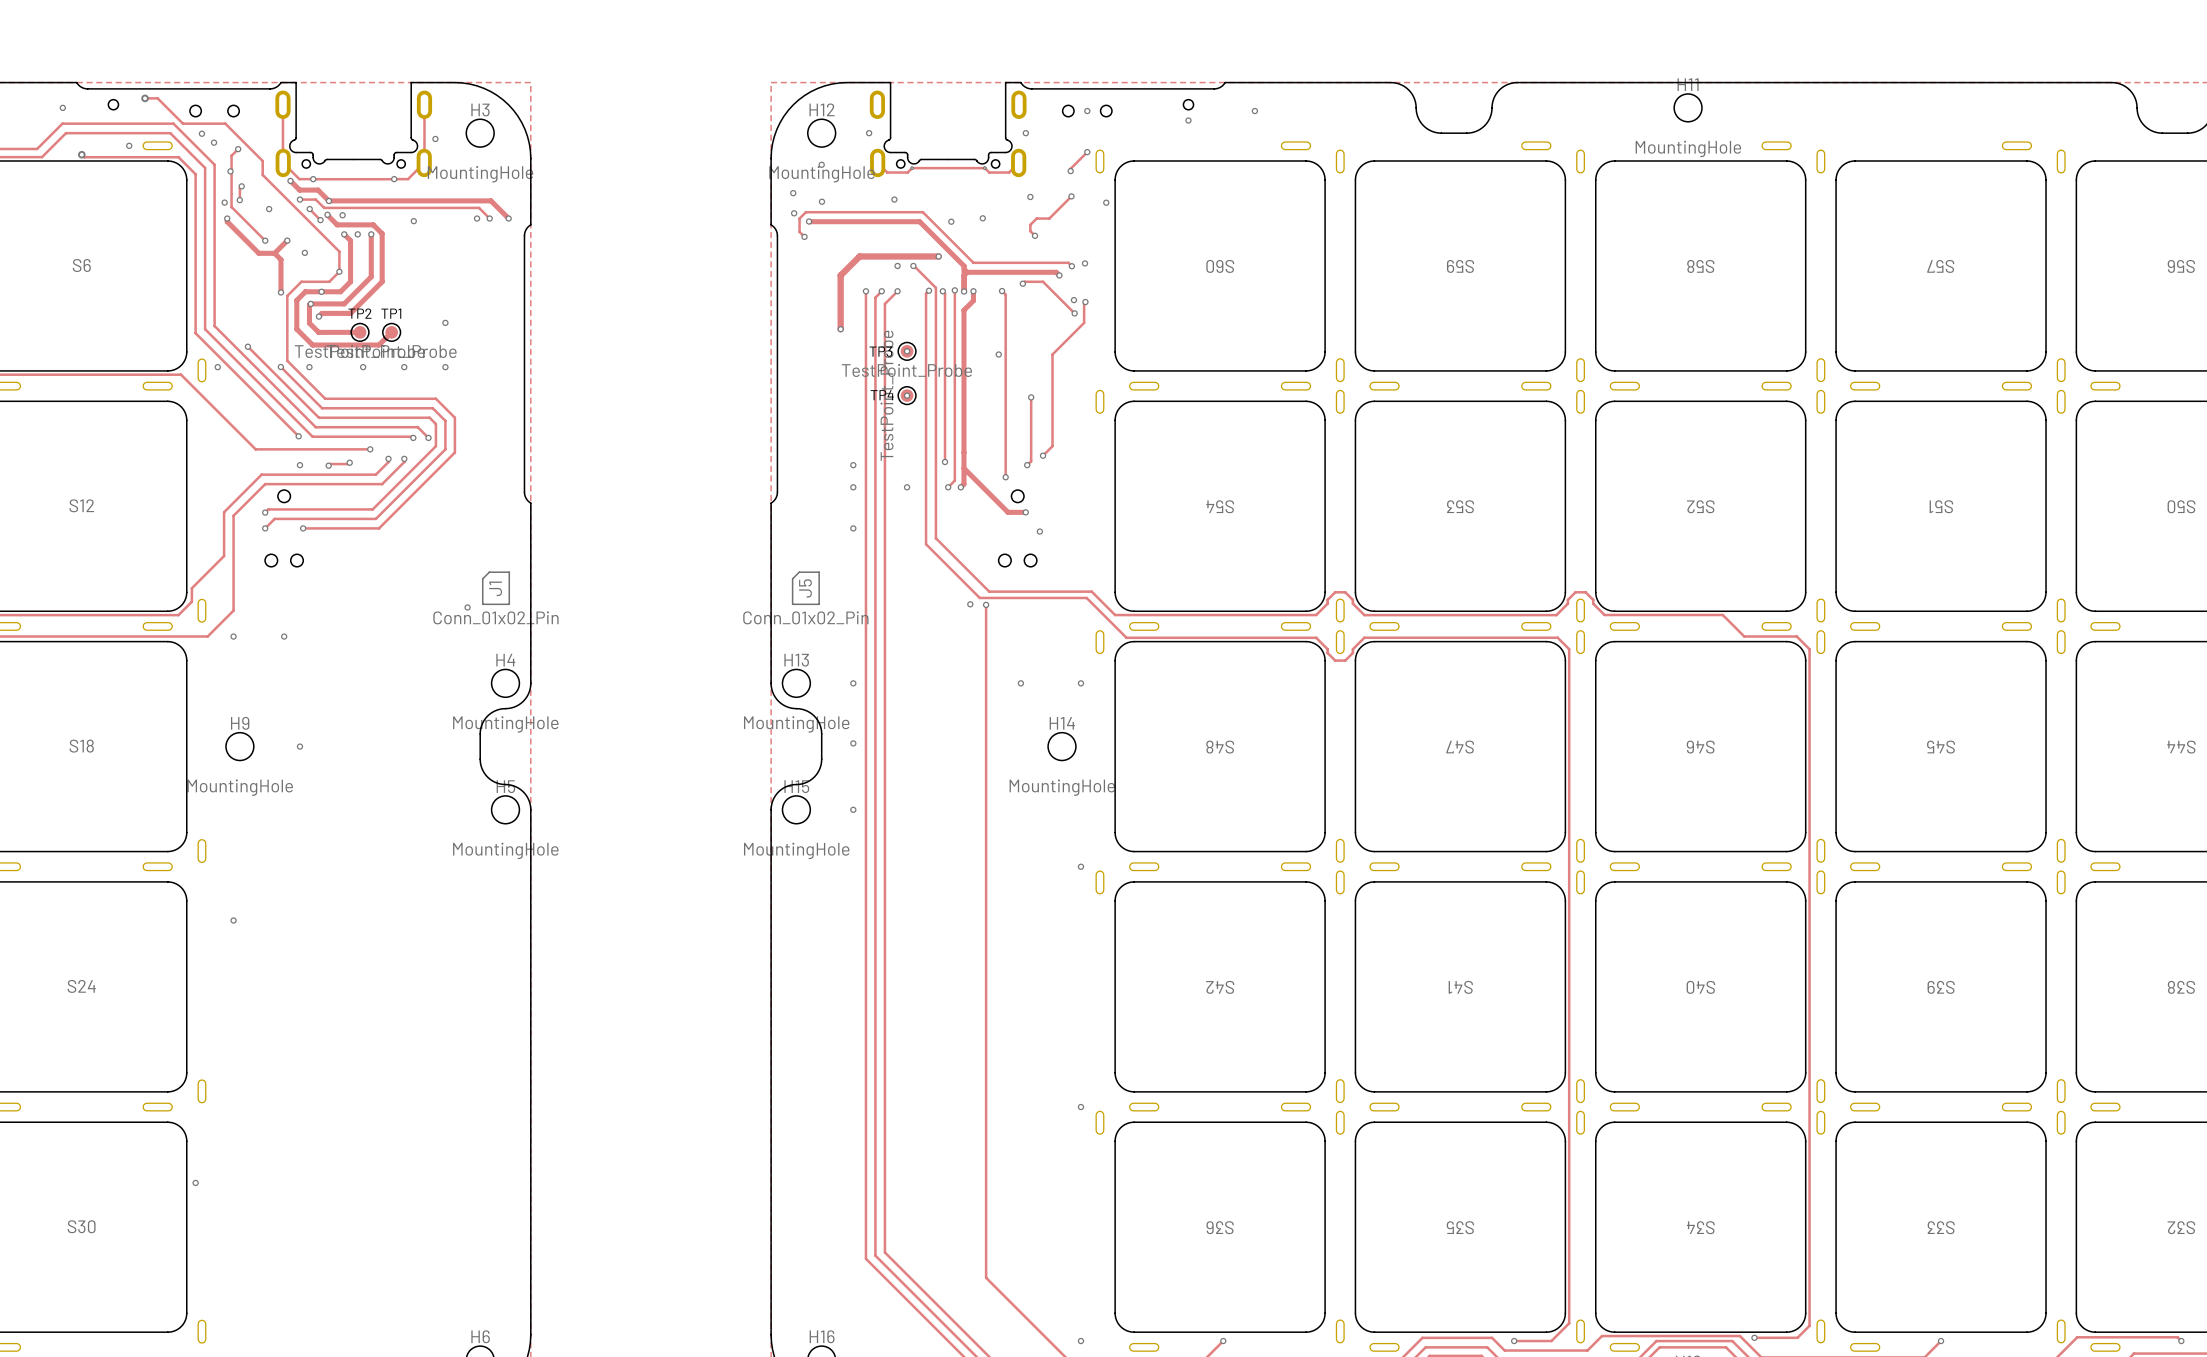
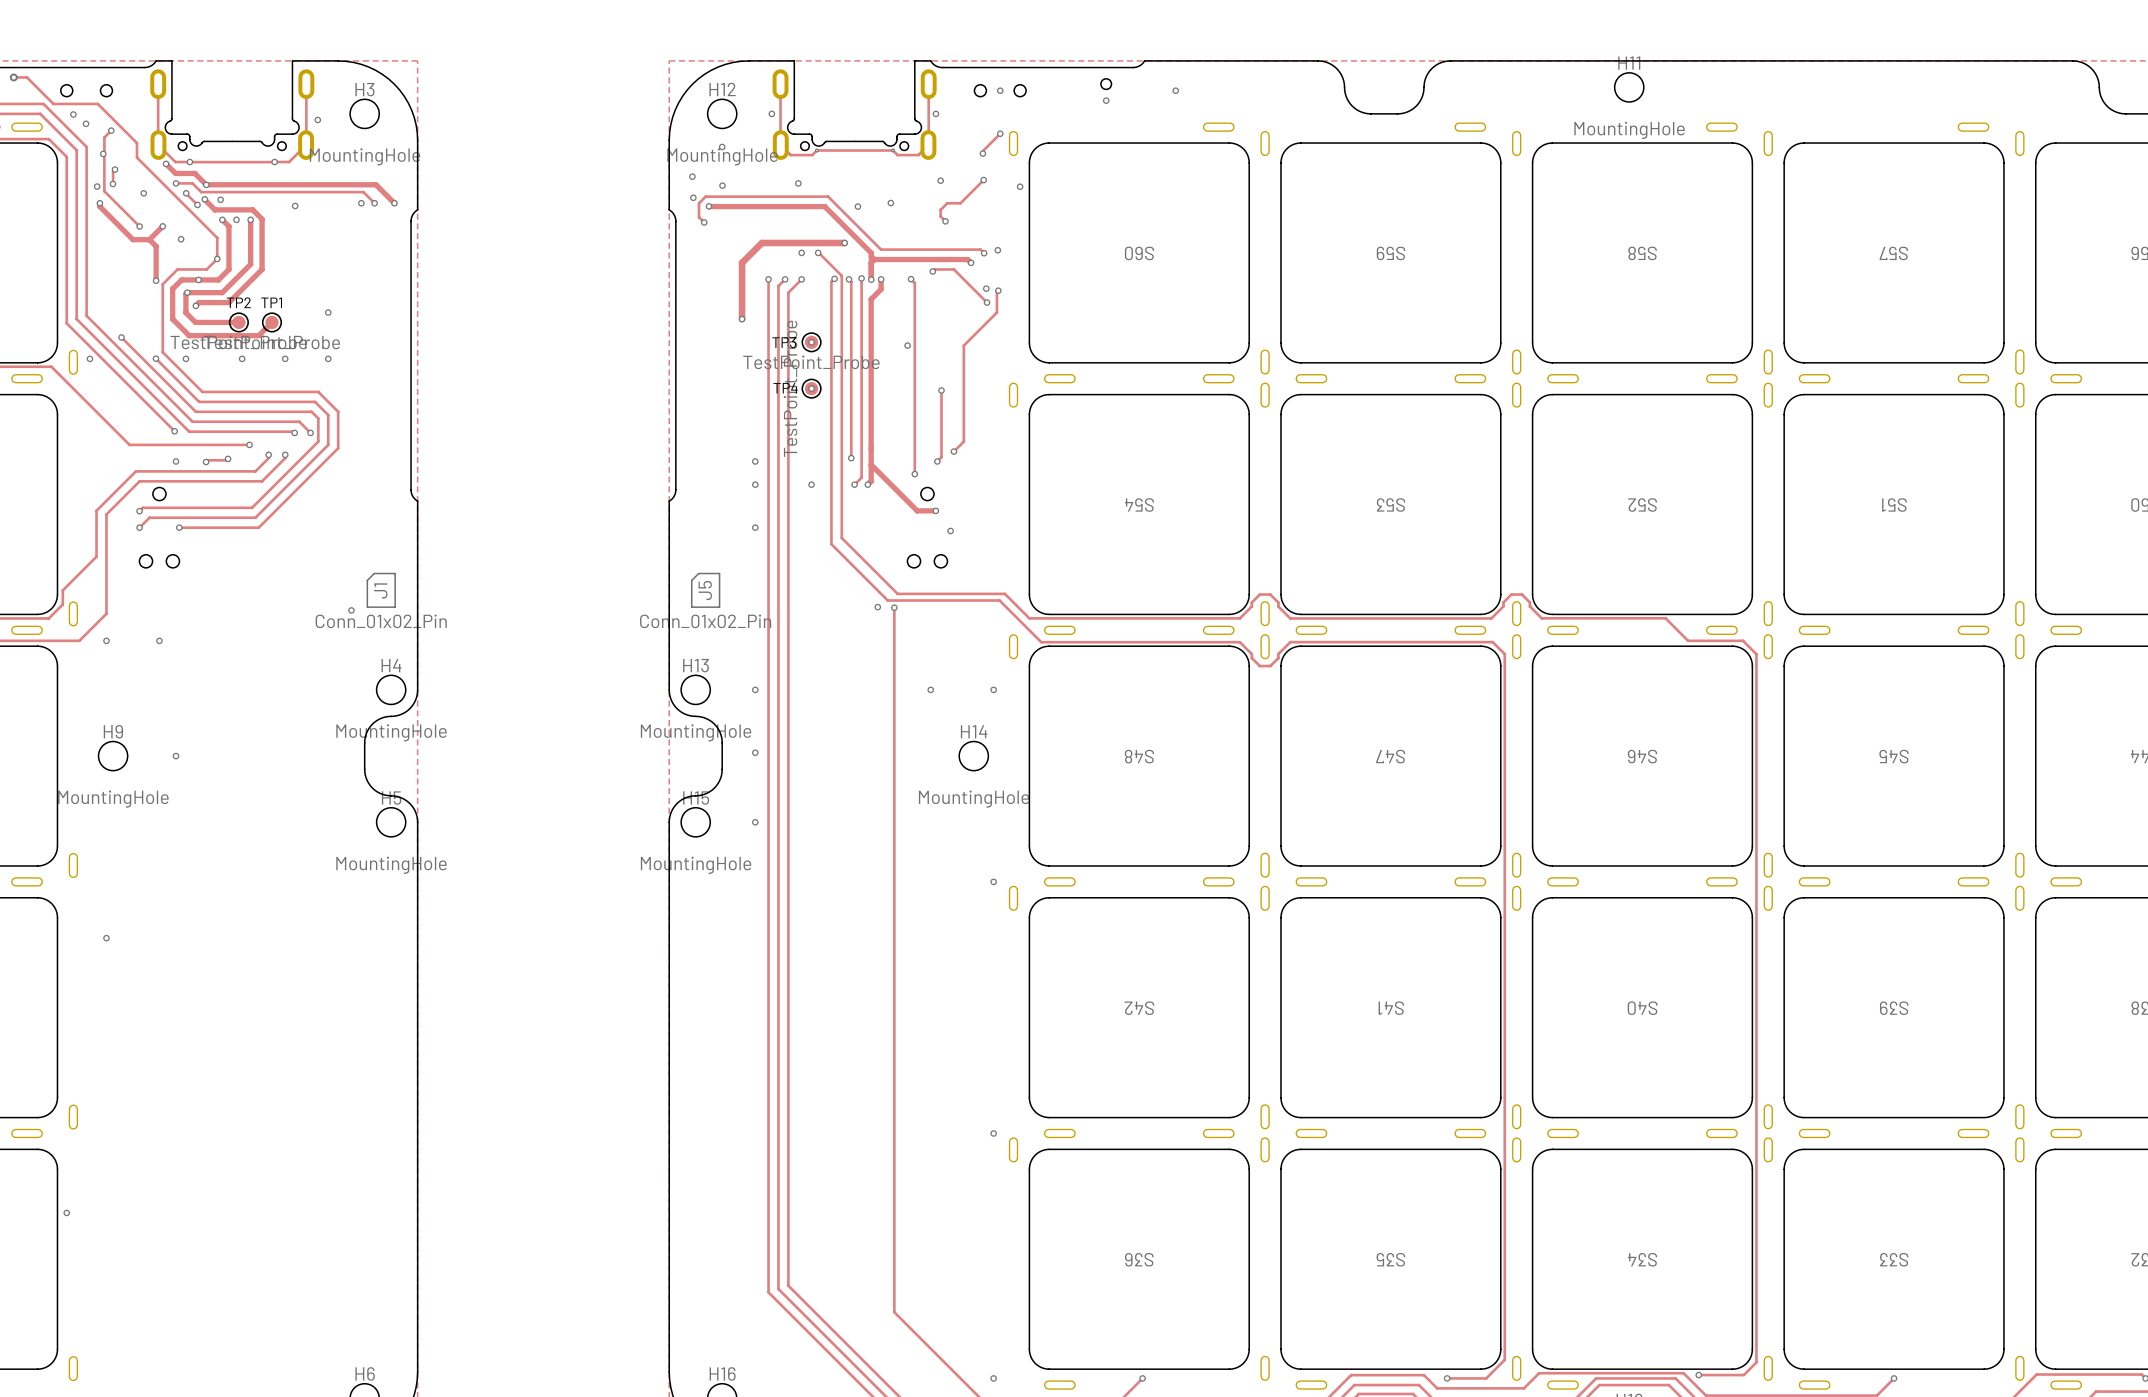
track: none -> (780, 84) (780, 145)
track: none -> (928, 84) (928, 145)

